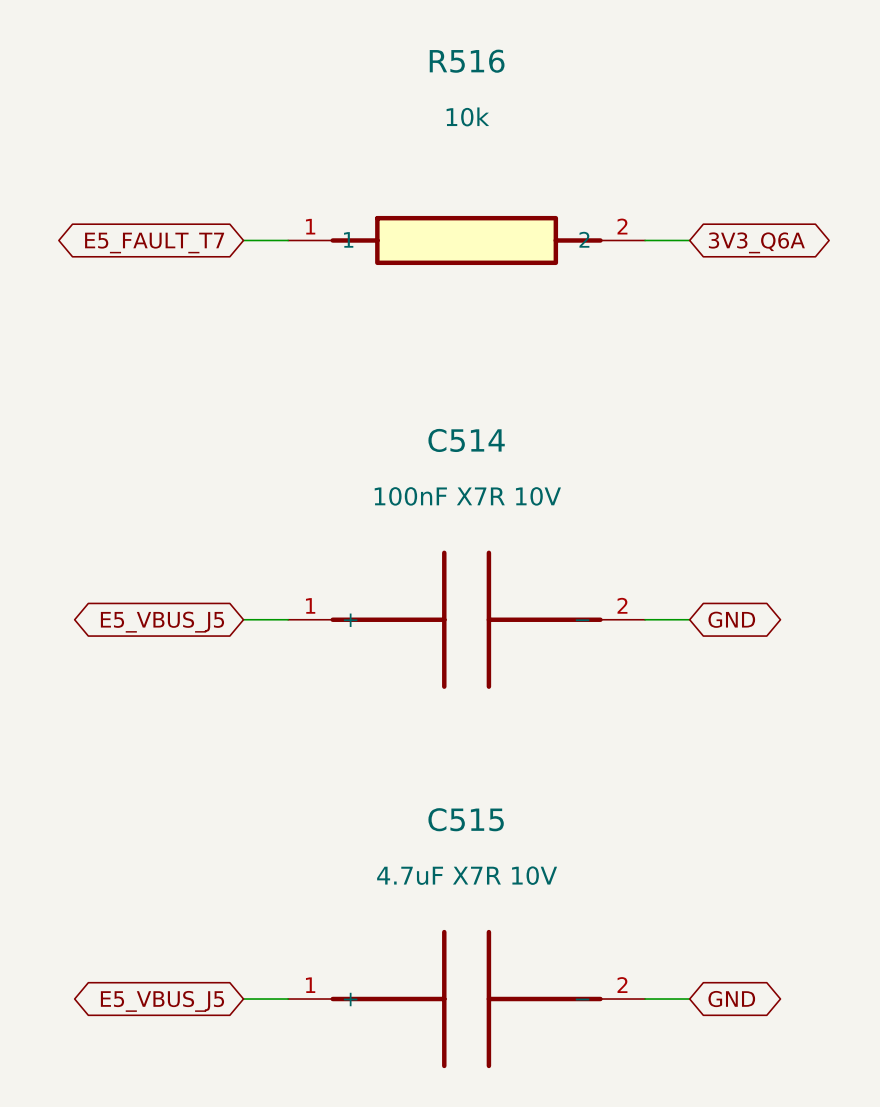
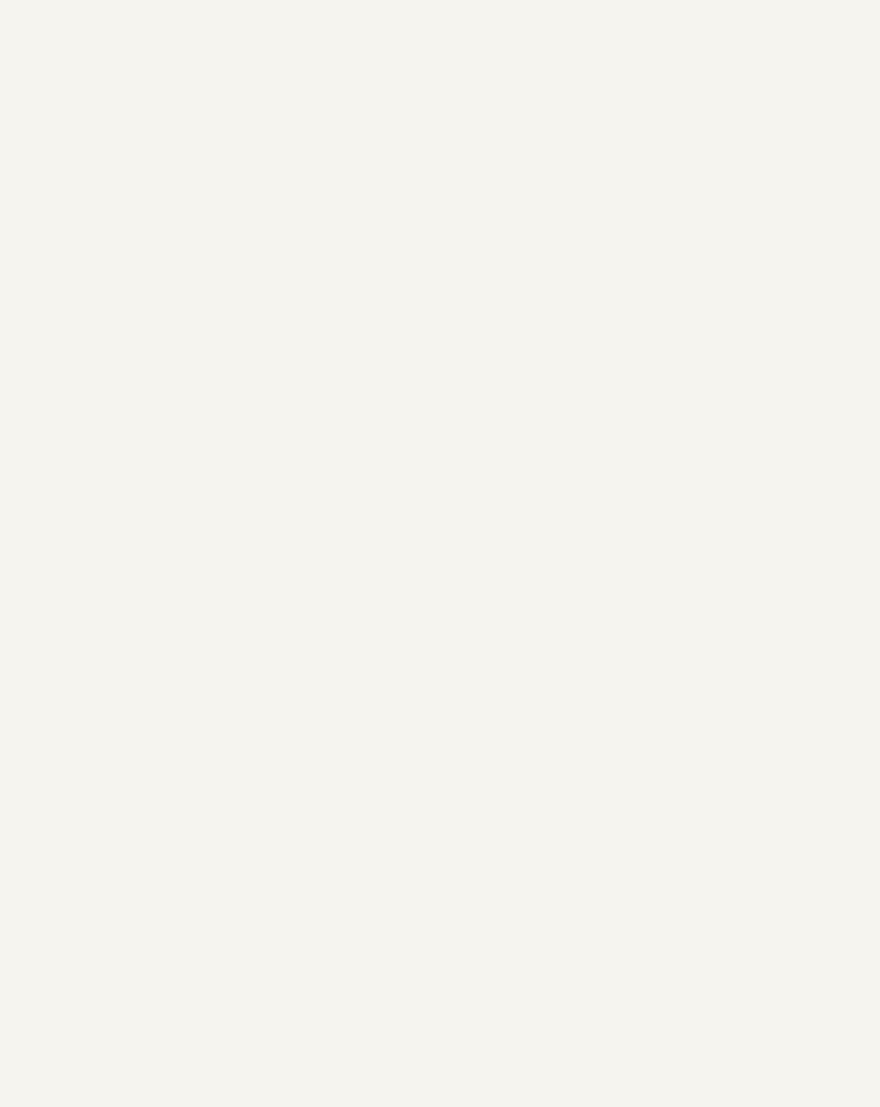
wire: (243, 240) (288, 240) -> none
R516: 10k (466, 240) -> none
wire: (645, 240) (689, 240) -> none
global label: 3V3_Q6A (756, 242) -> none
global label: E5_FAULT_T7 (154, 243) -> none
wire: (243, 619) (288, 619) -> none
C514: 100nF X7R 10V (466, 619) -> none
wire: (645, 619) (689, 619) -> none
global label: GND (731, 619) -> none
global label: E5_VBUS_J5 (162, 622) -> none
wire: (243, 999) (288, 999) -> none
C515: 4.7uF X7R 10V (466, 999) -> none
wire: (645, 999) (689, 999) -> none
global label: GND (731, 999) -> none
global label: E5_VBUS_J5 (162, 1001) -> none

